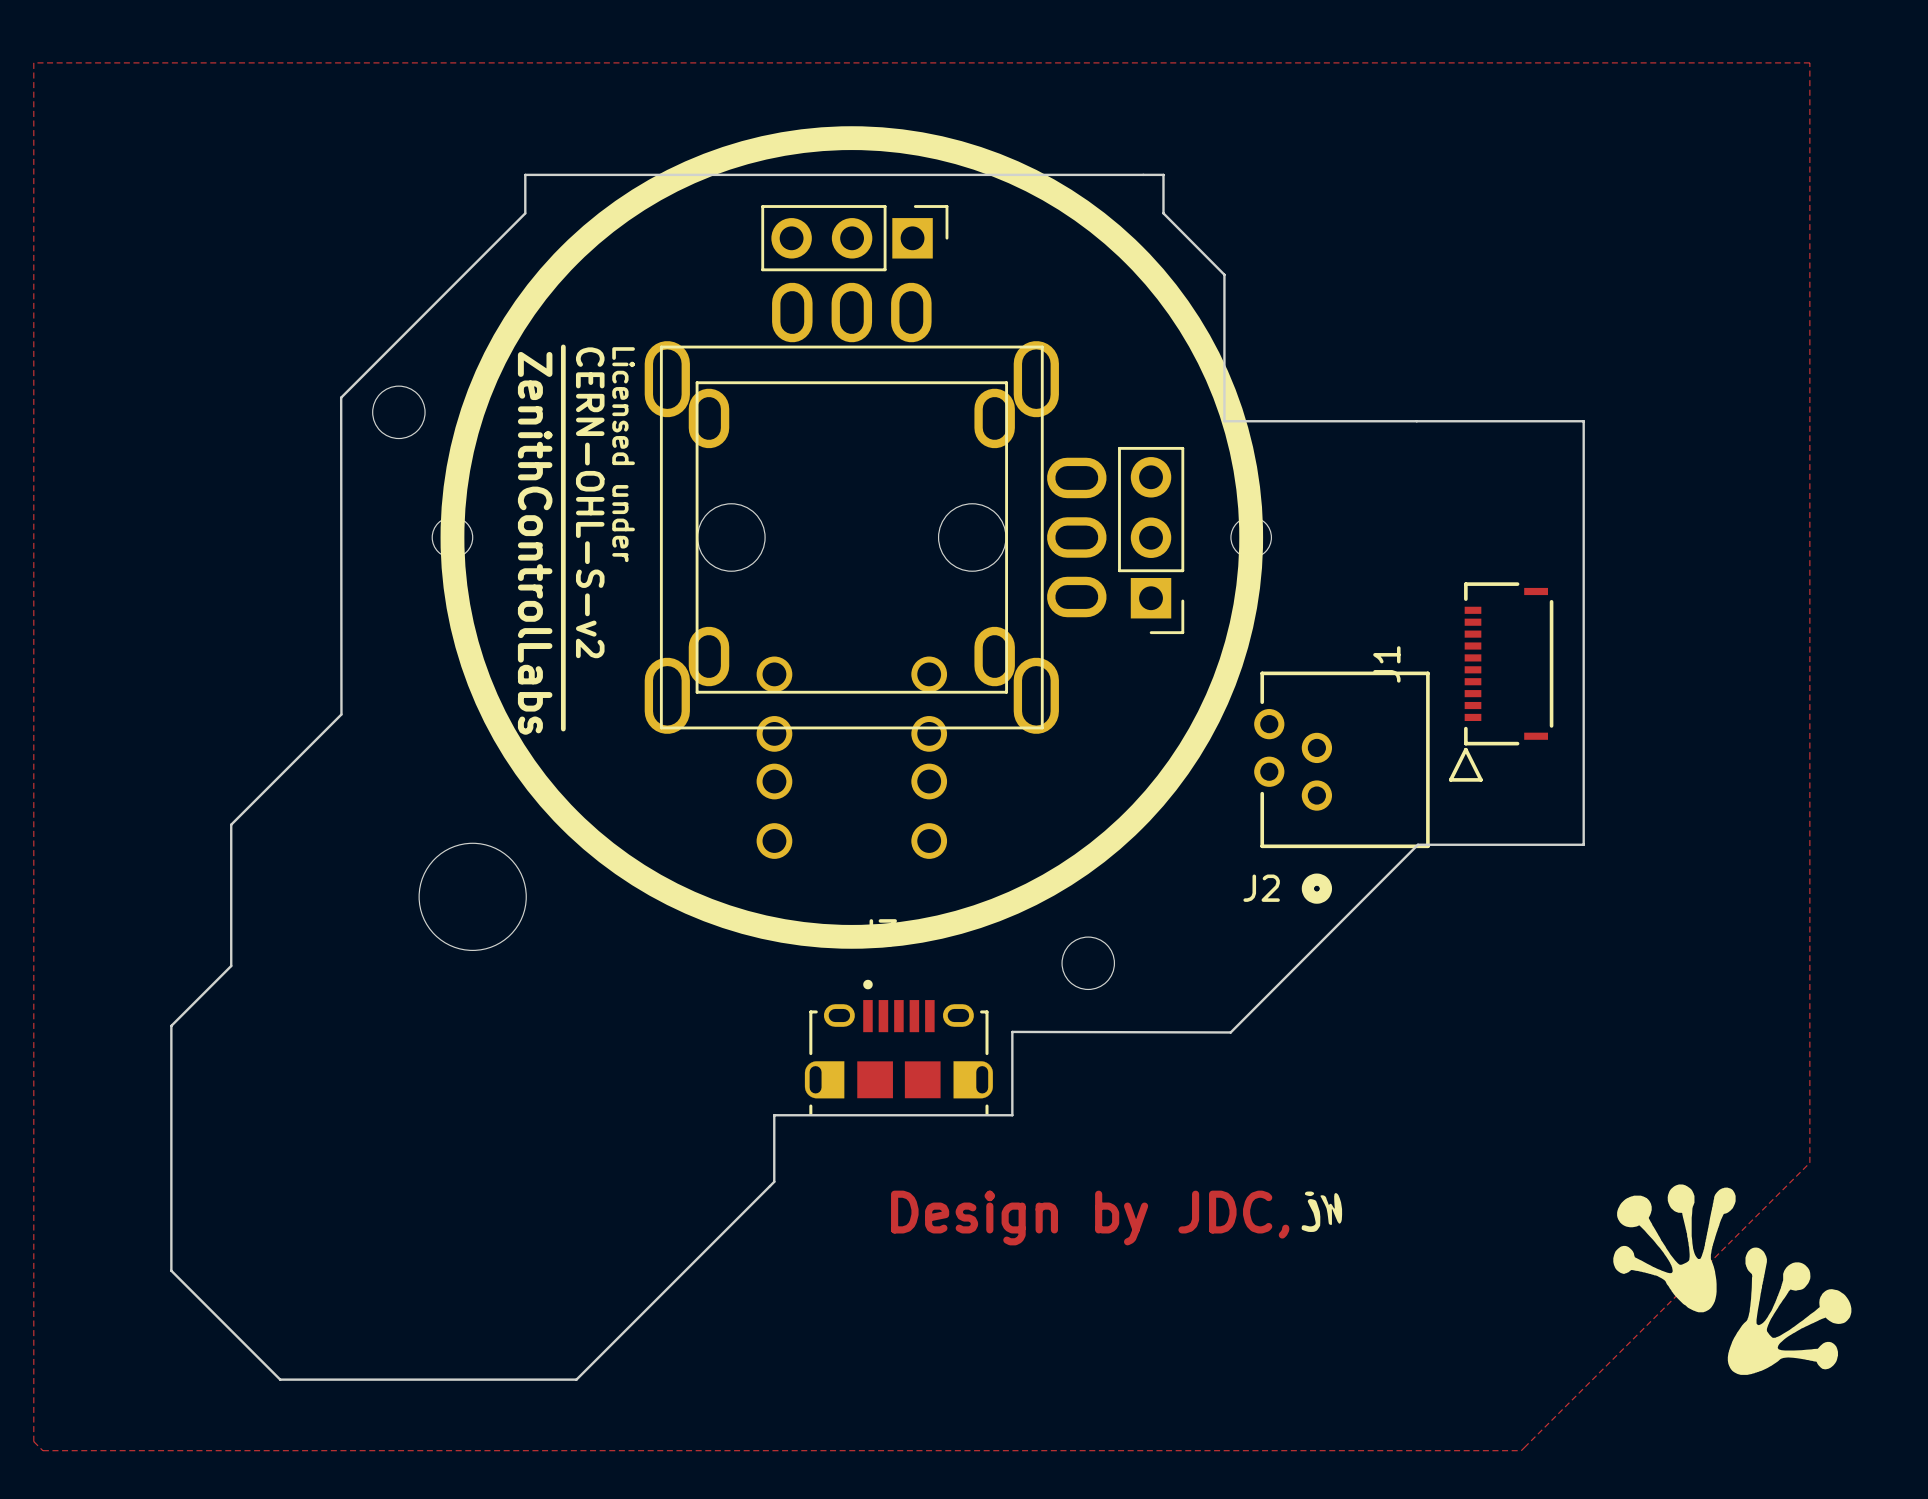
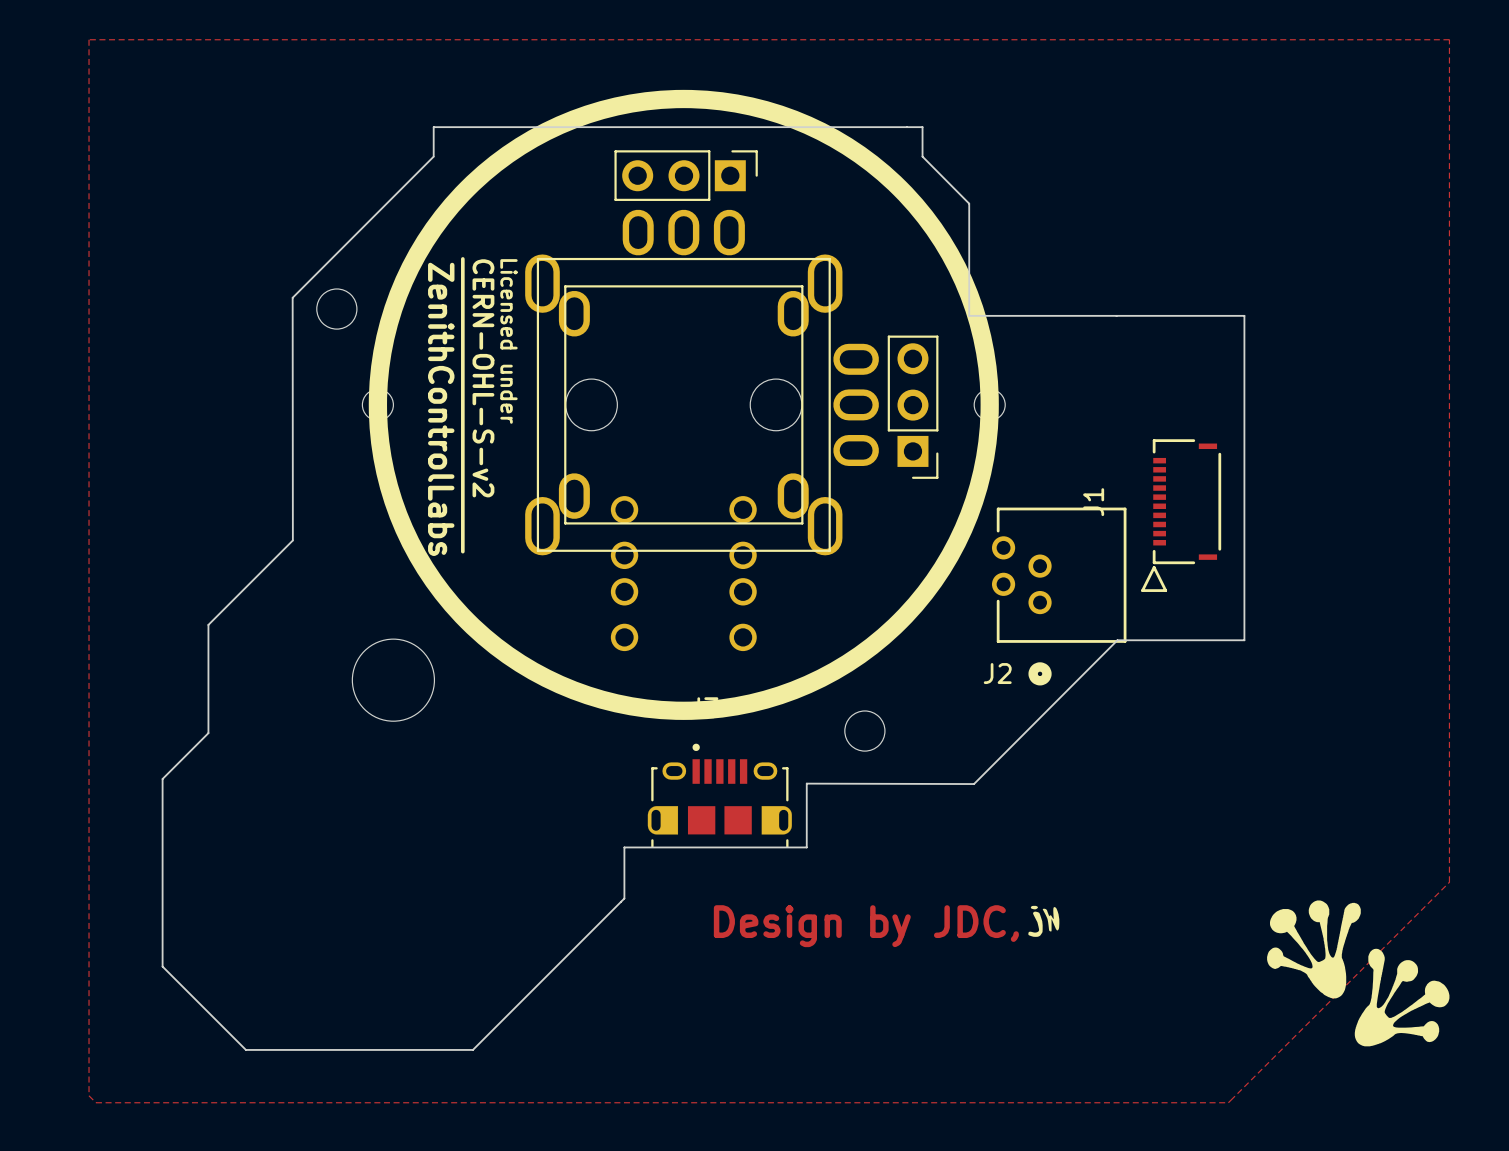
zone outline: (33, 62) (1809, 62) (1809, 1162) (1521, 1450) (42, 1450) (33, 1441) (33, 62) -> (89, 39) (89, 1095) (95, 1102) (1228, 1102) (1449, 882) (1449, 39) (89, 39)

